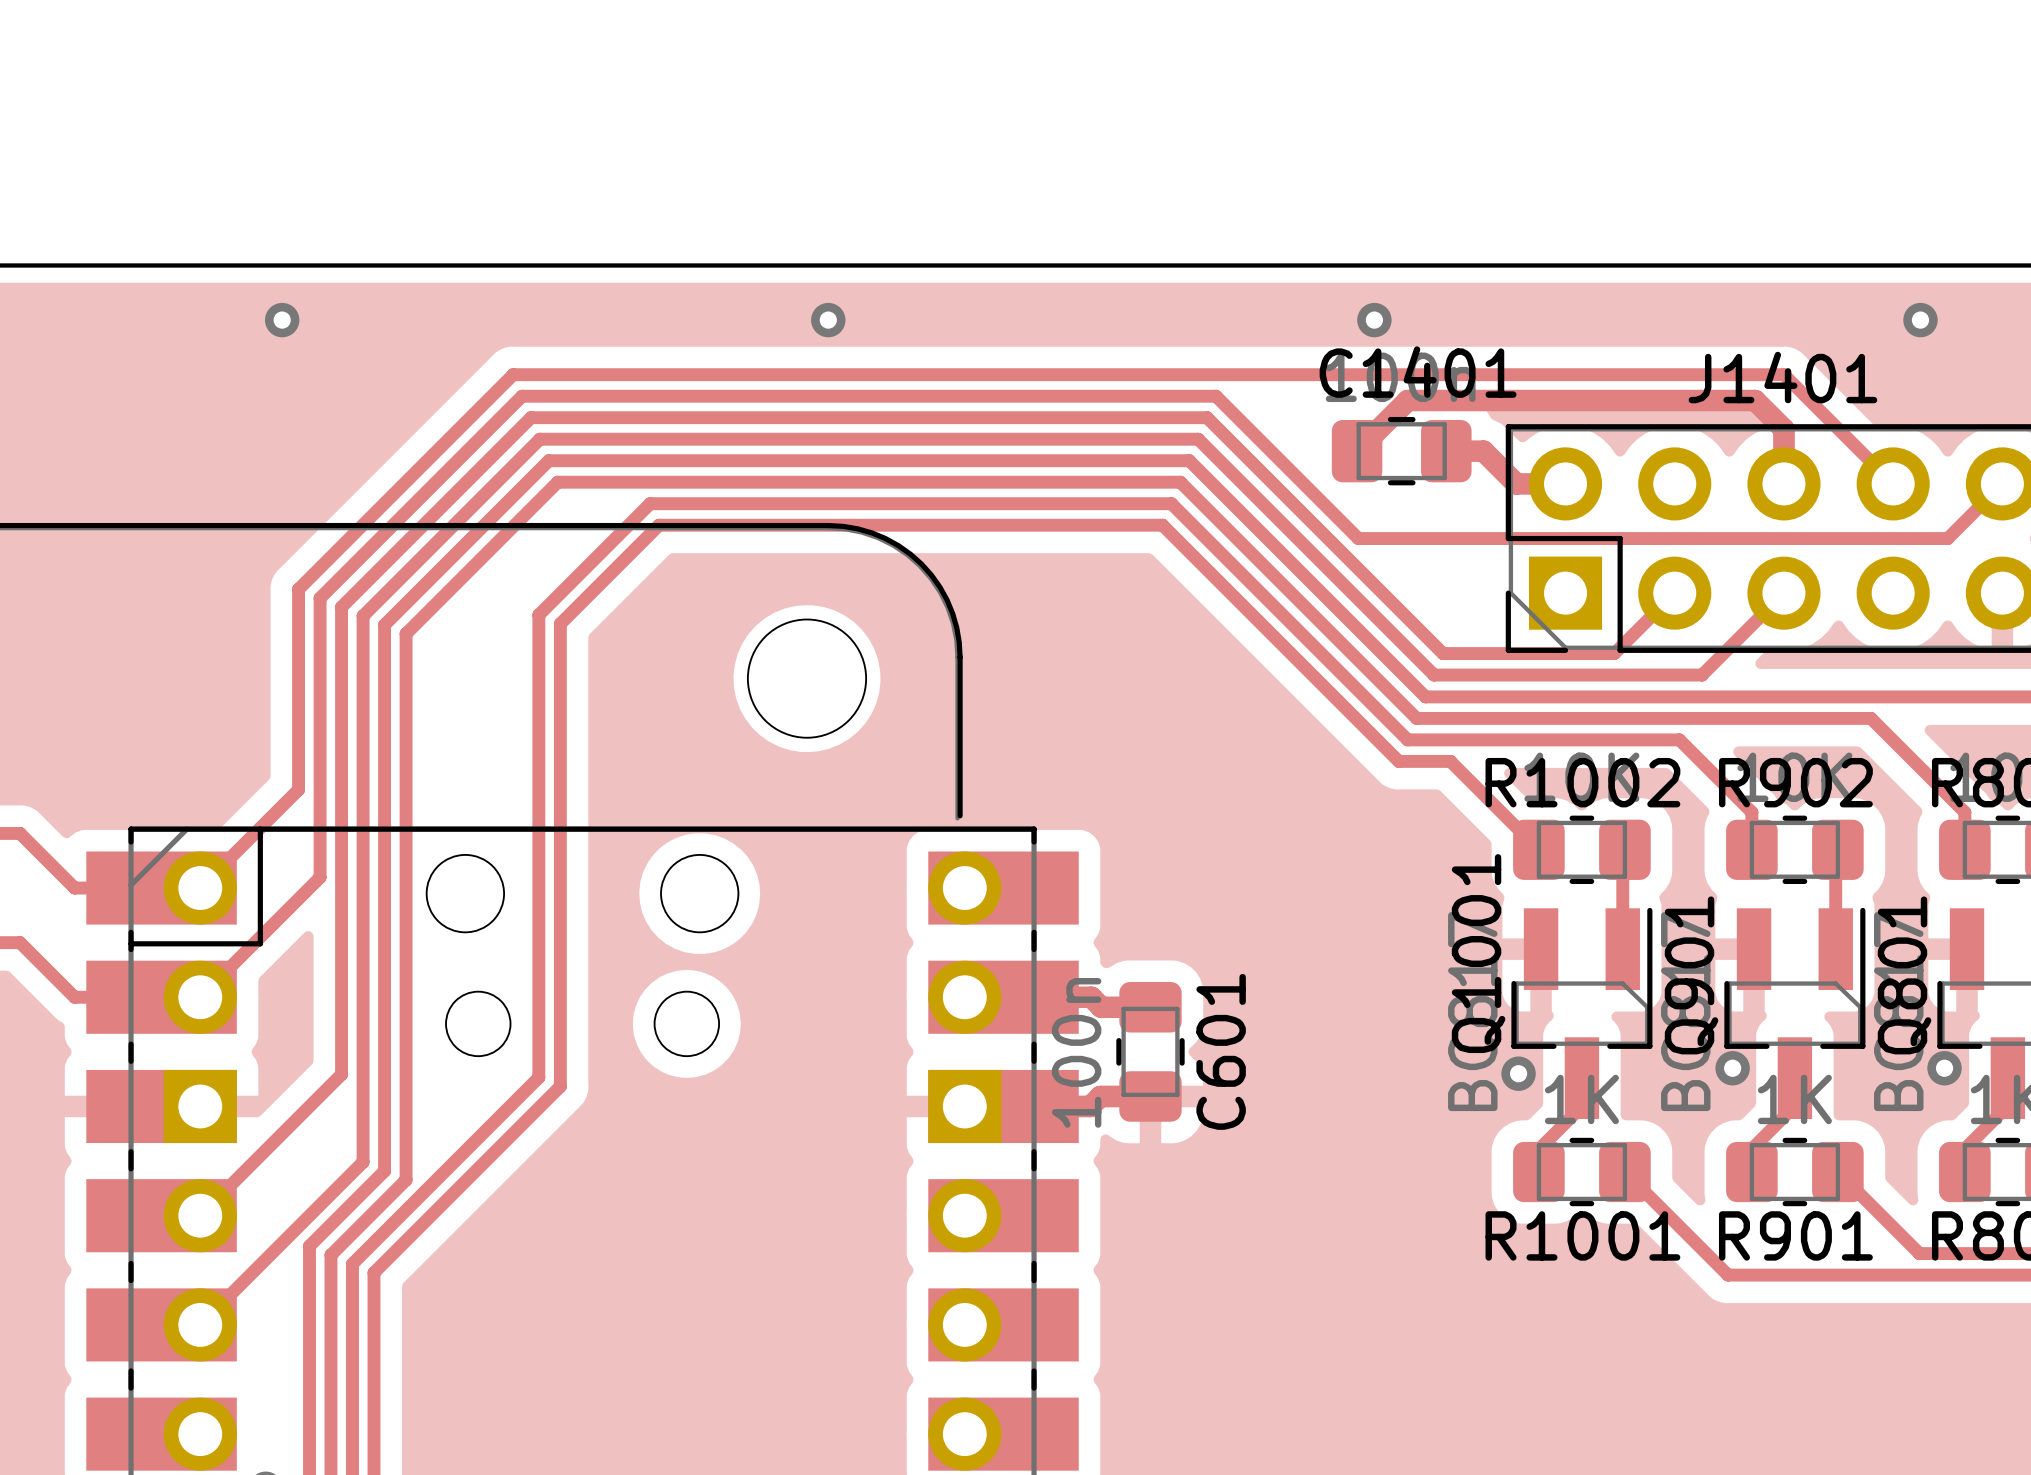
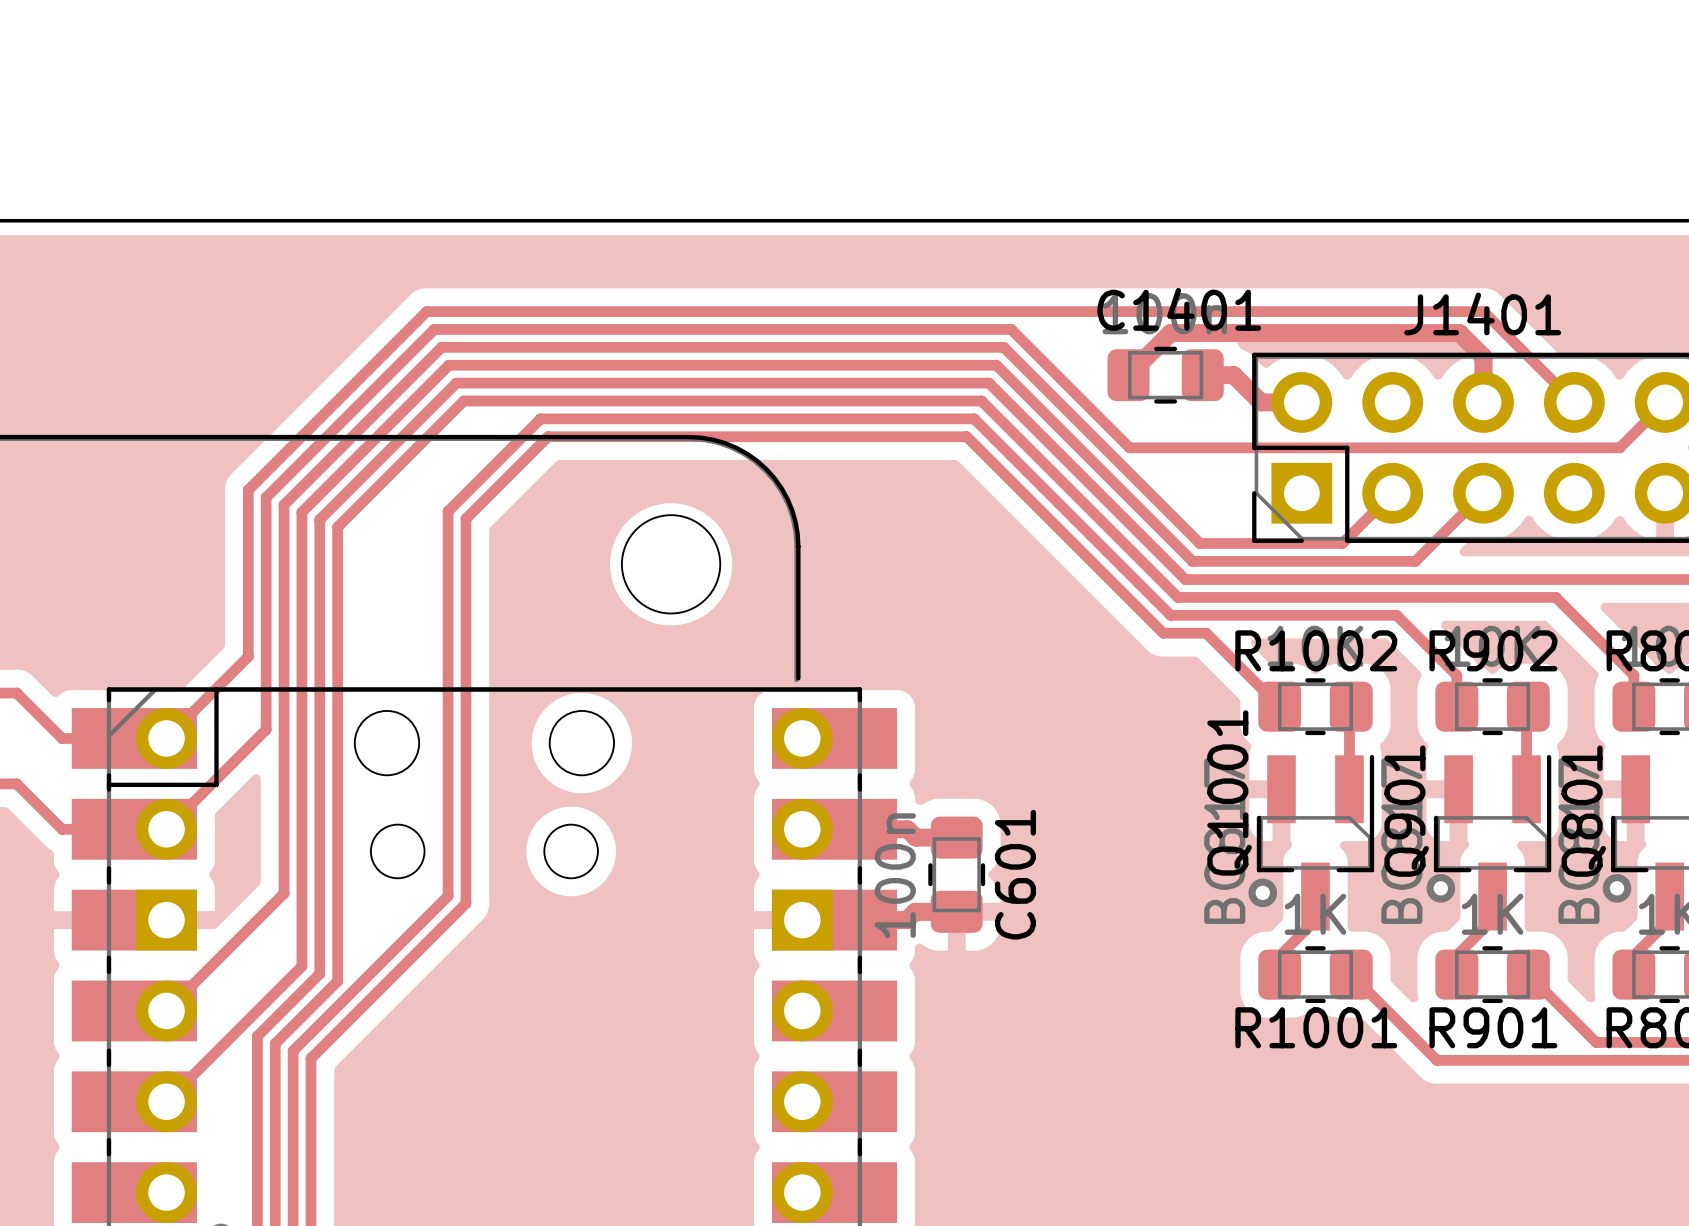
via: (282, 320) -> none
via: (828, 320) -> none
via: (1374, 320) -> none
via: (1920, 320) -> none

